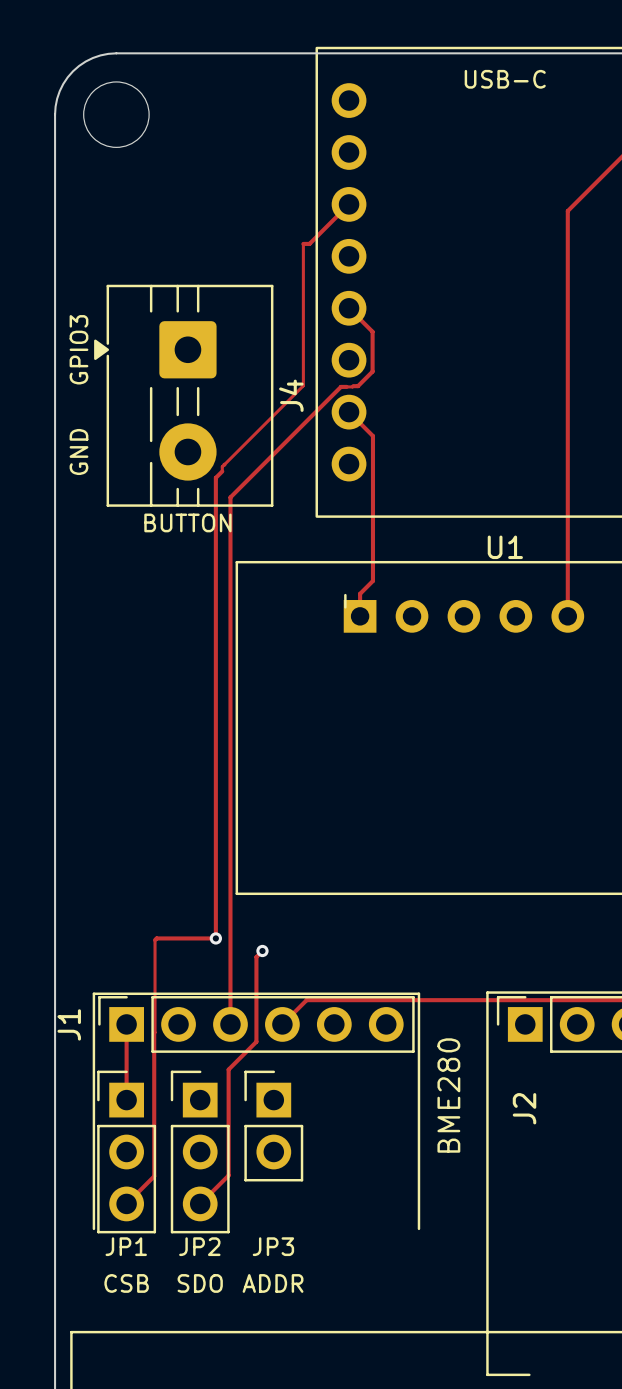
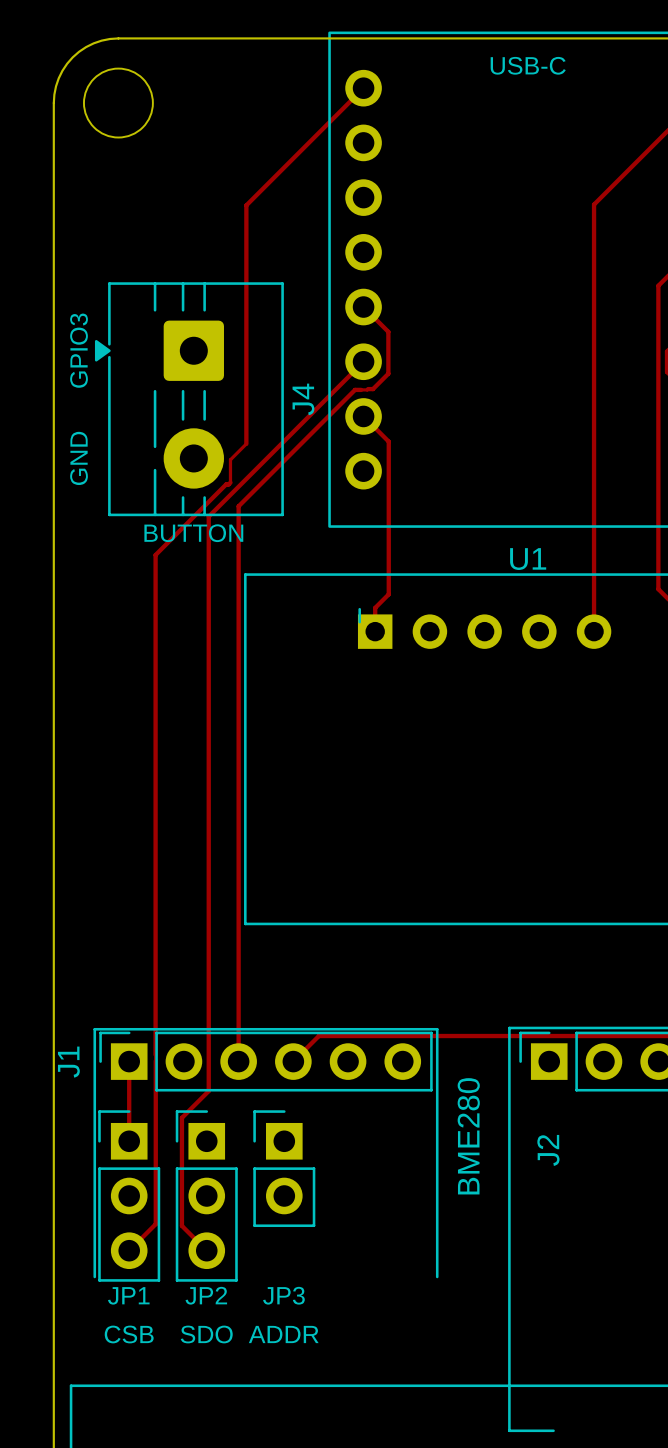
track: none -> (363, 88) (246, 205) (246, 443) (230, 459) (230, 482) (226, 484) (155, 555) (155, 1060)
track: (349, 204) (309, 243) (303, 243) (303, 385) (224, 464) -> none
track: (224, 464) (222, 471) (215, 477) (215, 938) (156, 938) (155, 940) (154, 1176) (151, 1178) -> (155, 1060) (155, 1224)
via: (215, 938) -> none
track: (262, 950) (256, 957) (256, 1041) (228, 1069) (228, 1175) (200, 1203) -> (363, 361) (208, 516) (208, 1091) (181, 1117) (181, 1225) (206, 1250)
via: (262, 950) -> none

